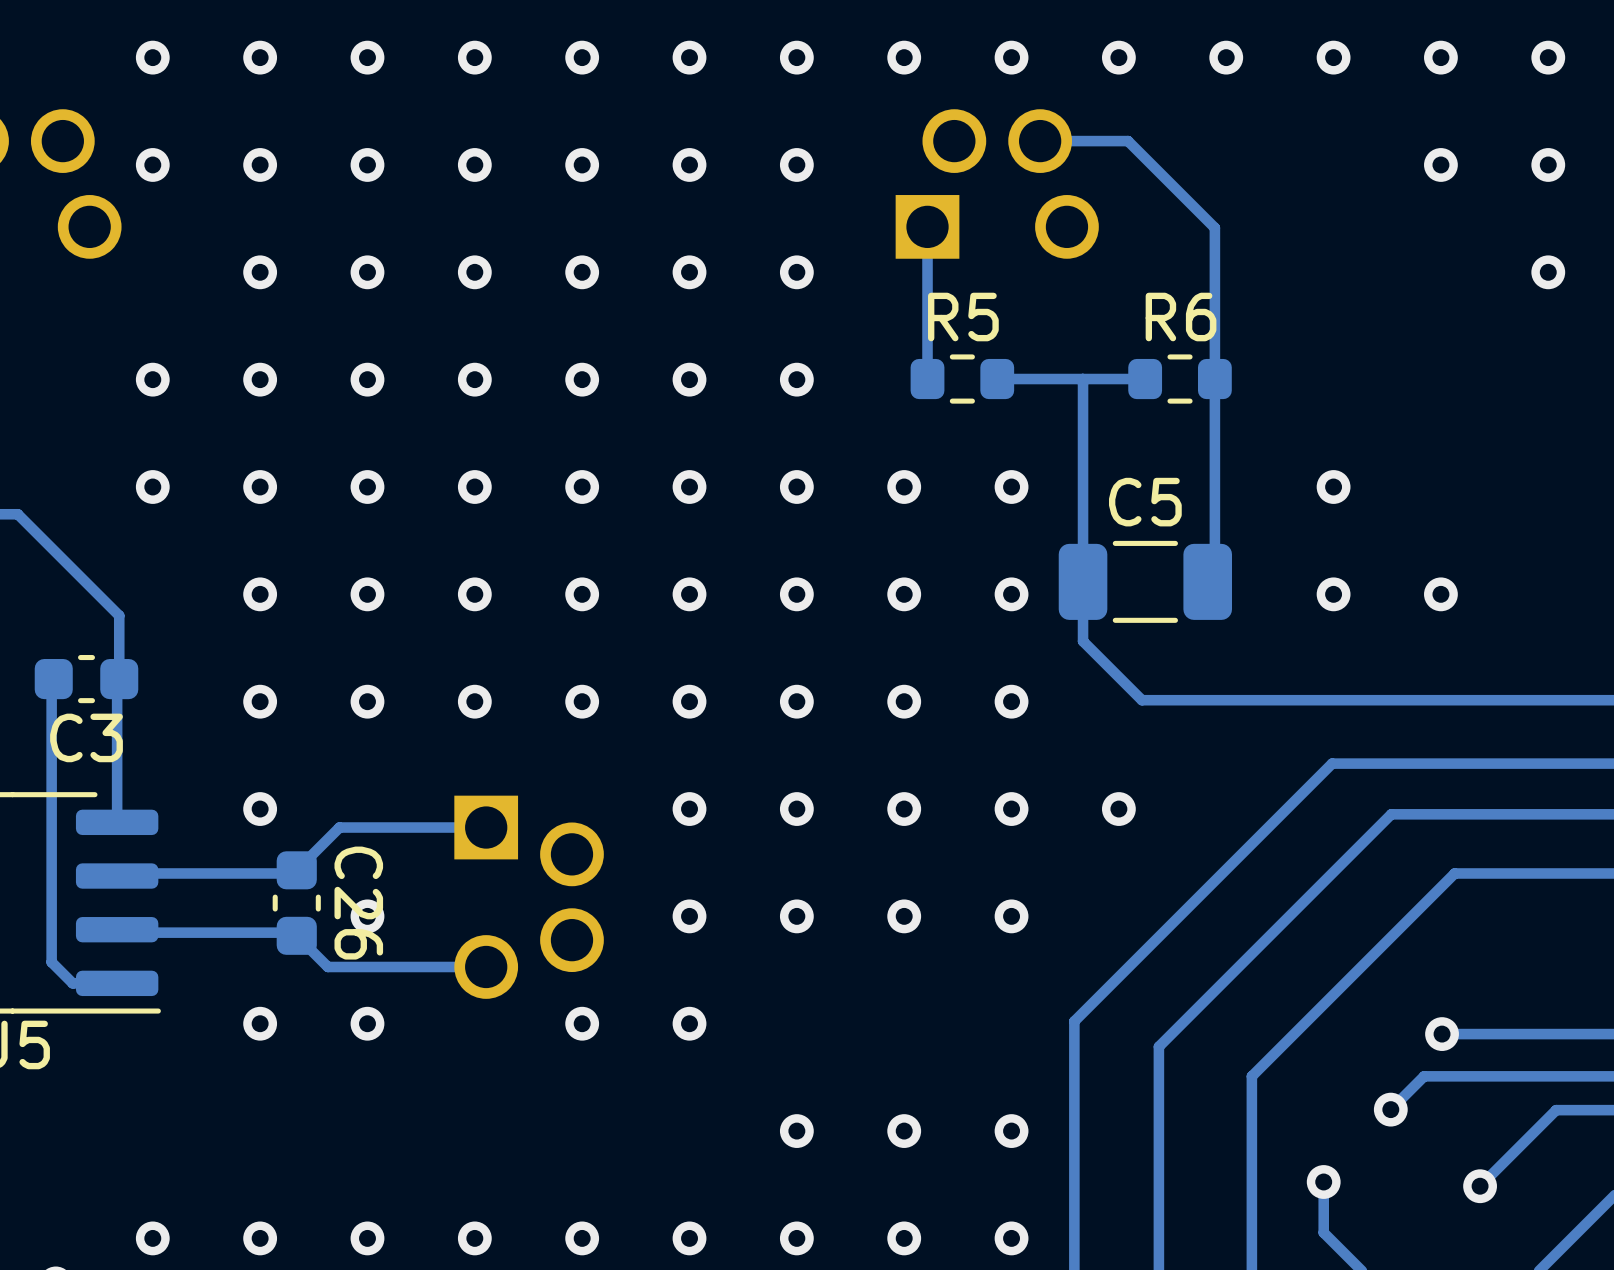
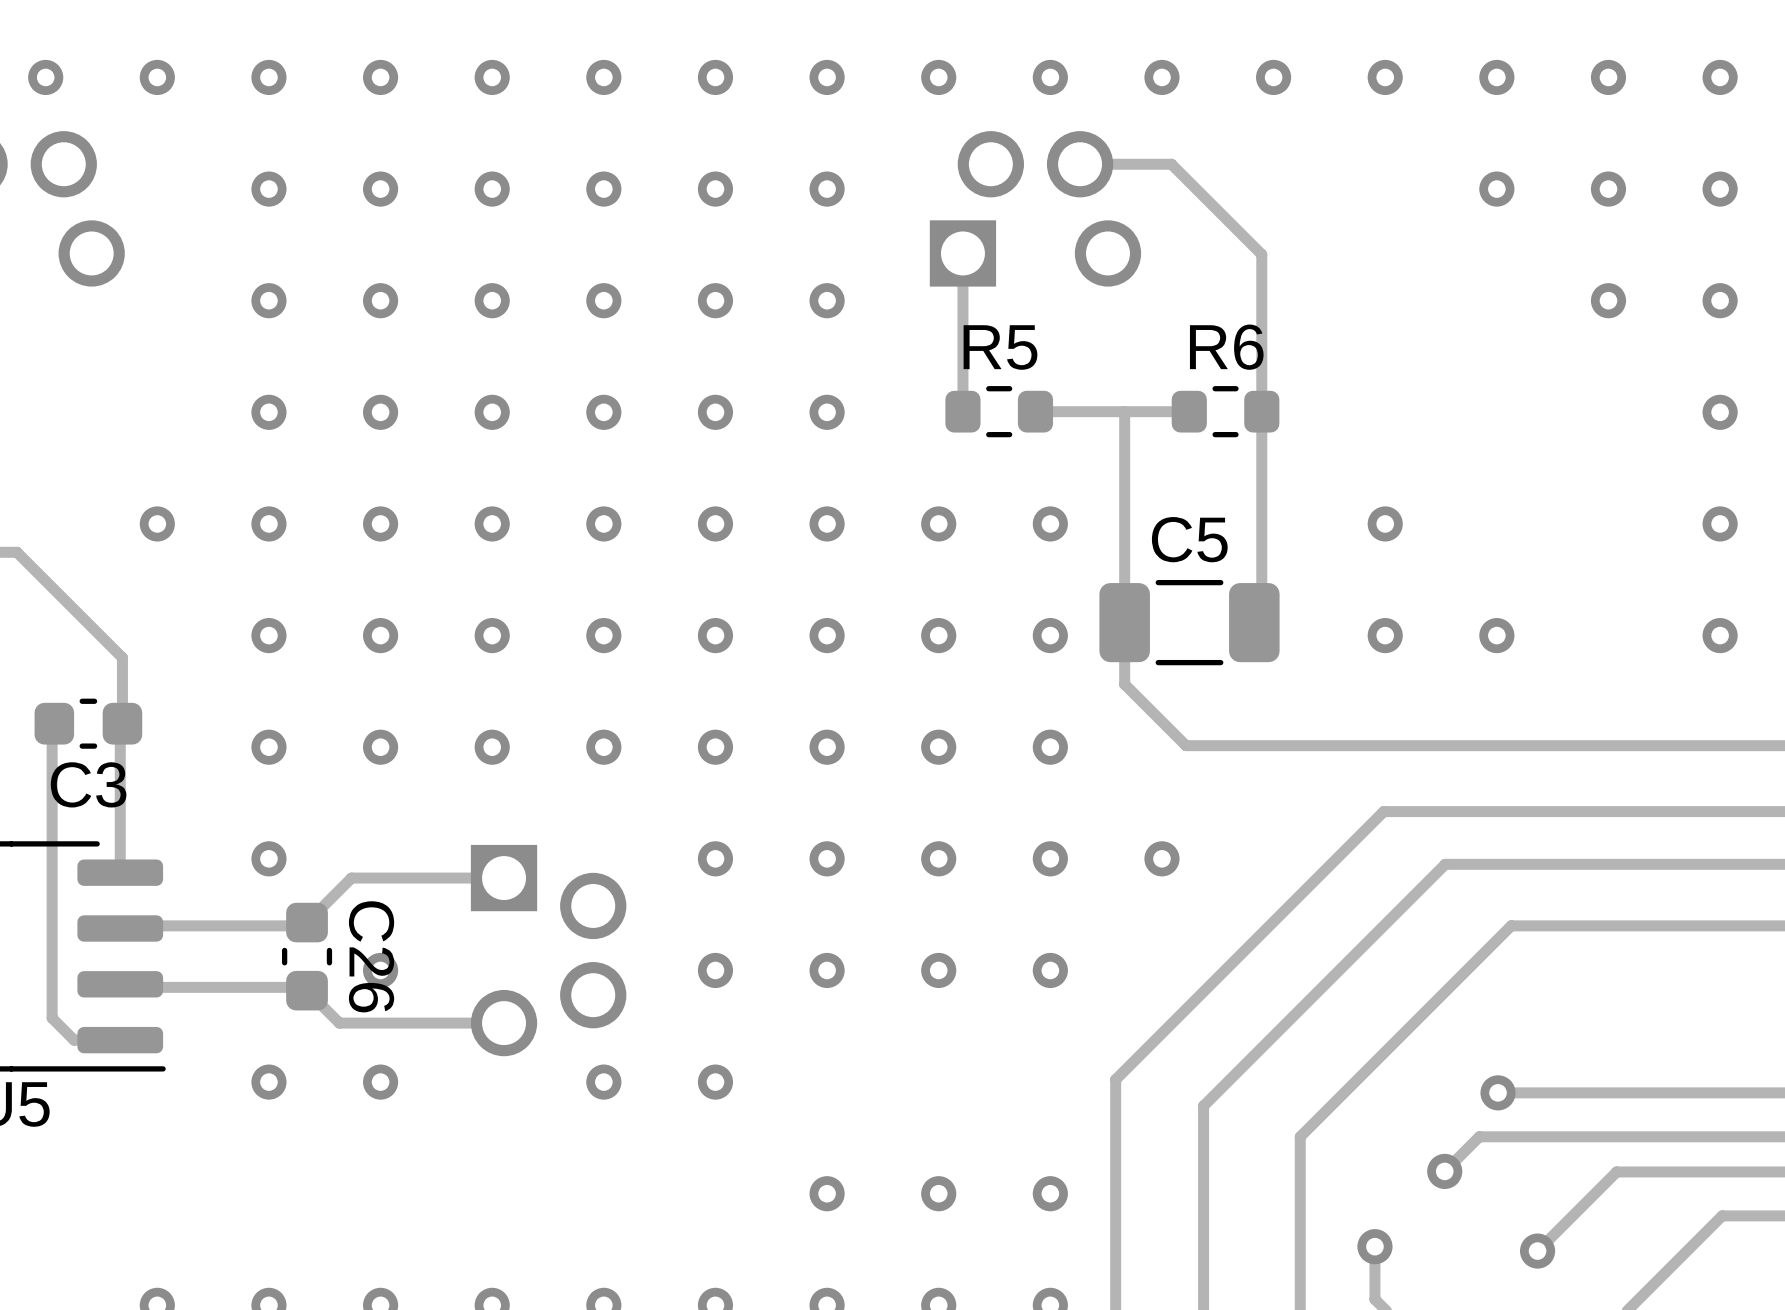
via: none -> (45, 77)
via: (152, 164) -> none
via: (152, 379) -> none

